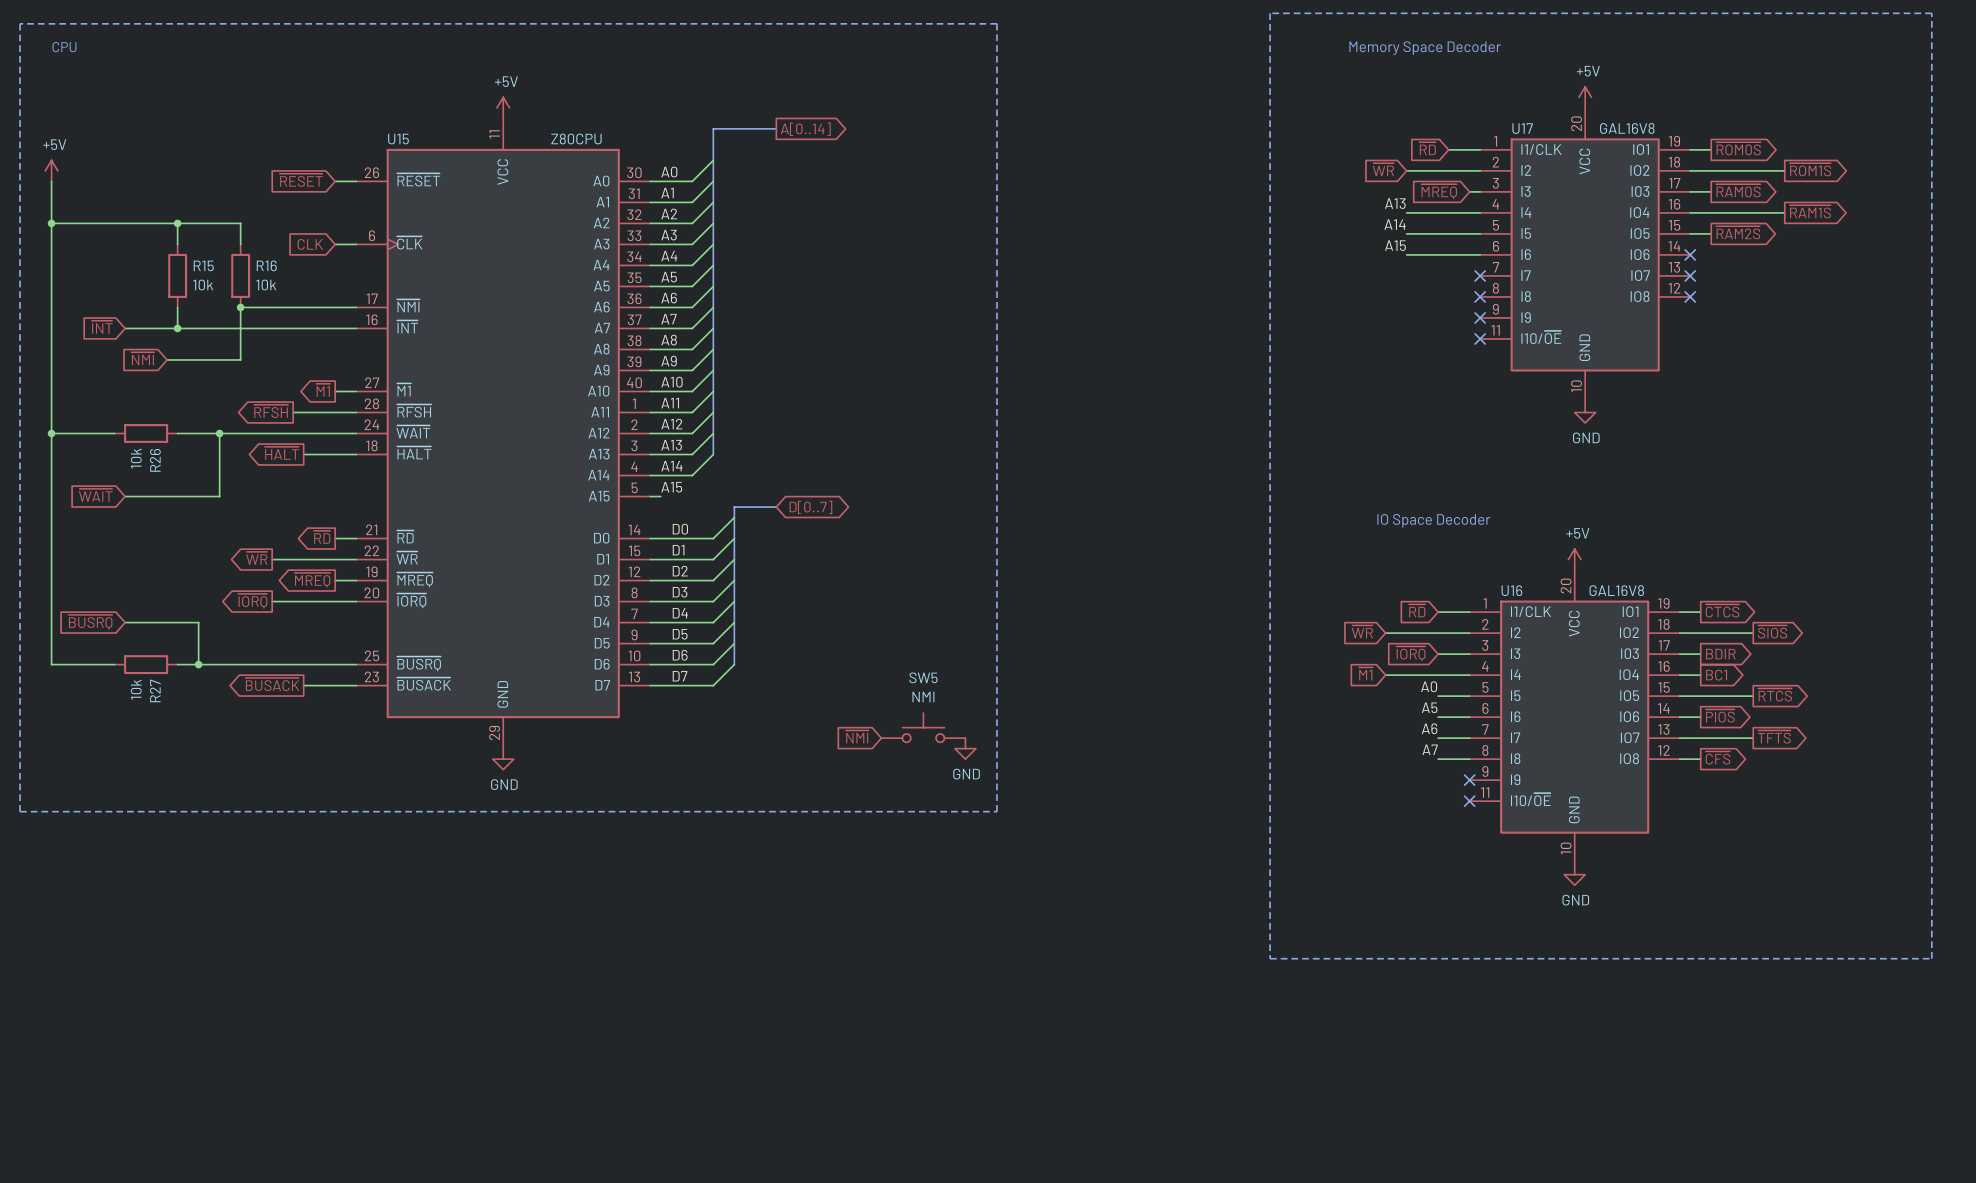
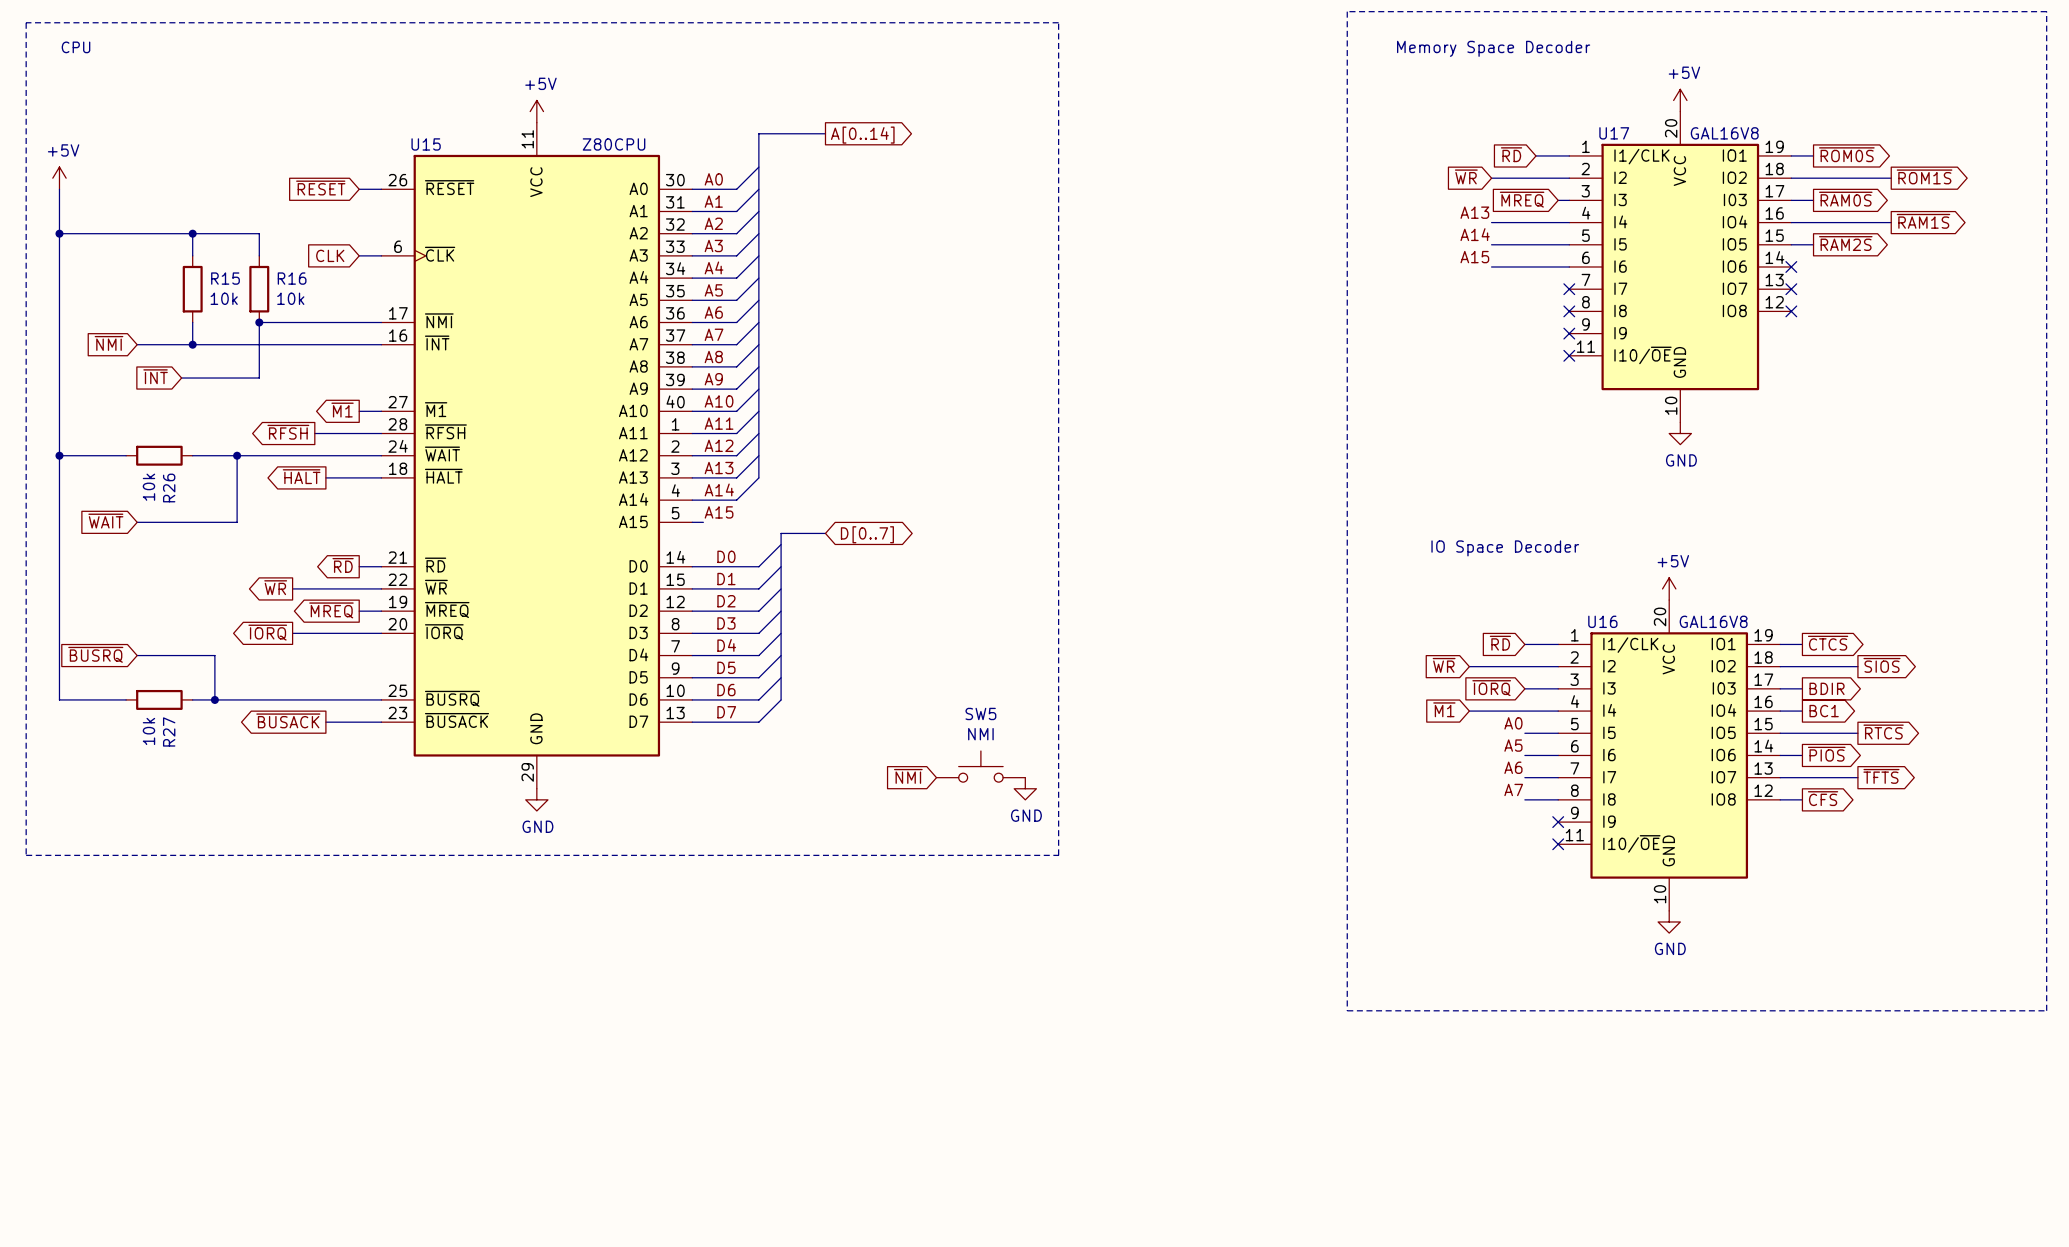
global label: ~{INT} (102, 327) -> ~{NMI} (109, 343)
global label: ~{NMI} (142, 358) -> ~{INT} (155, 376)

